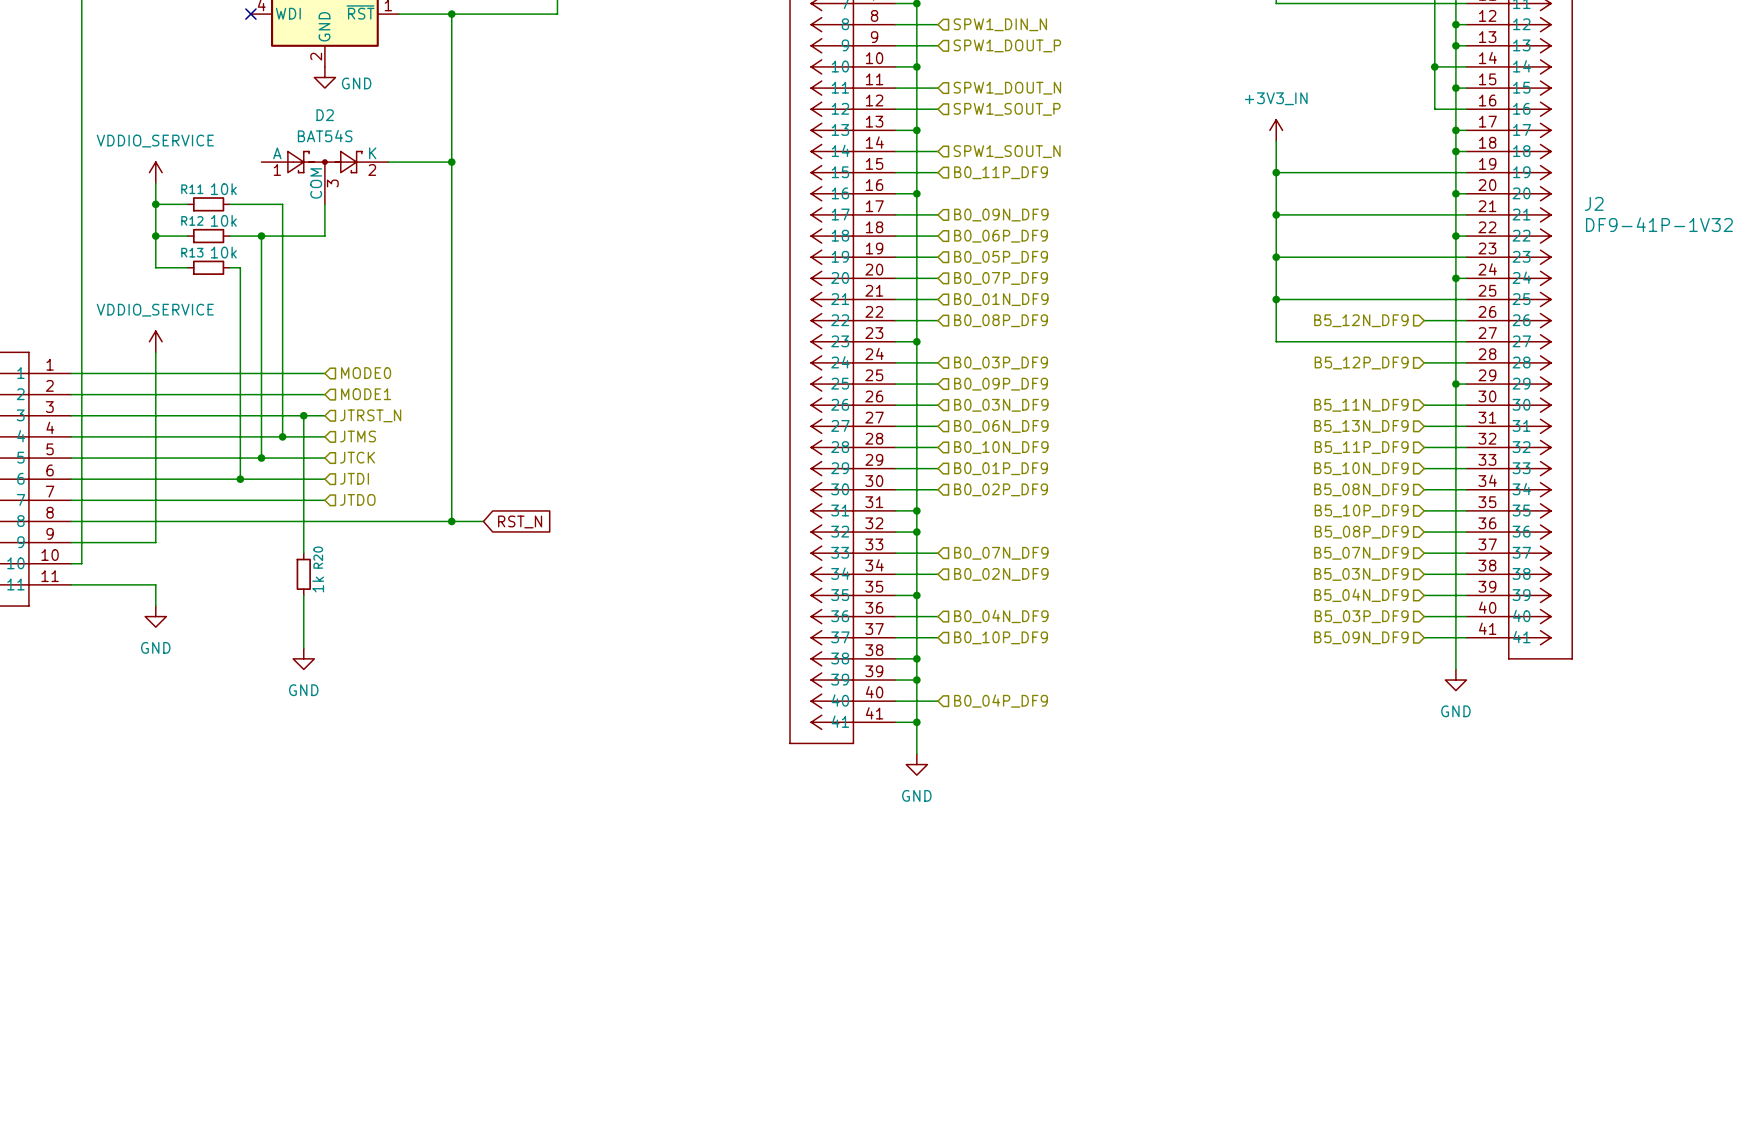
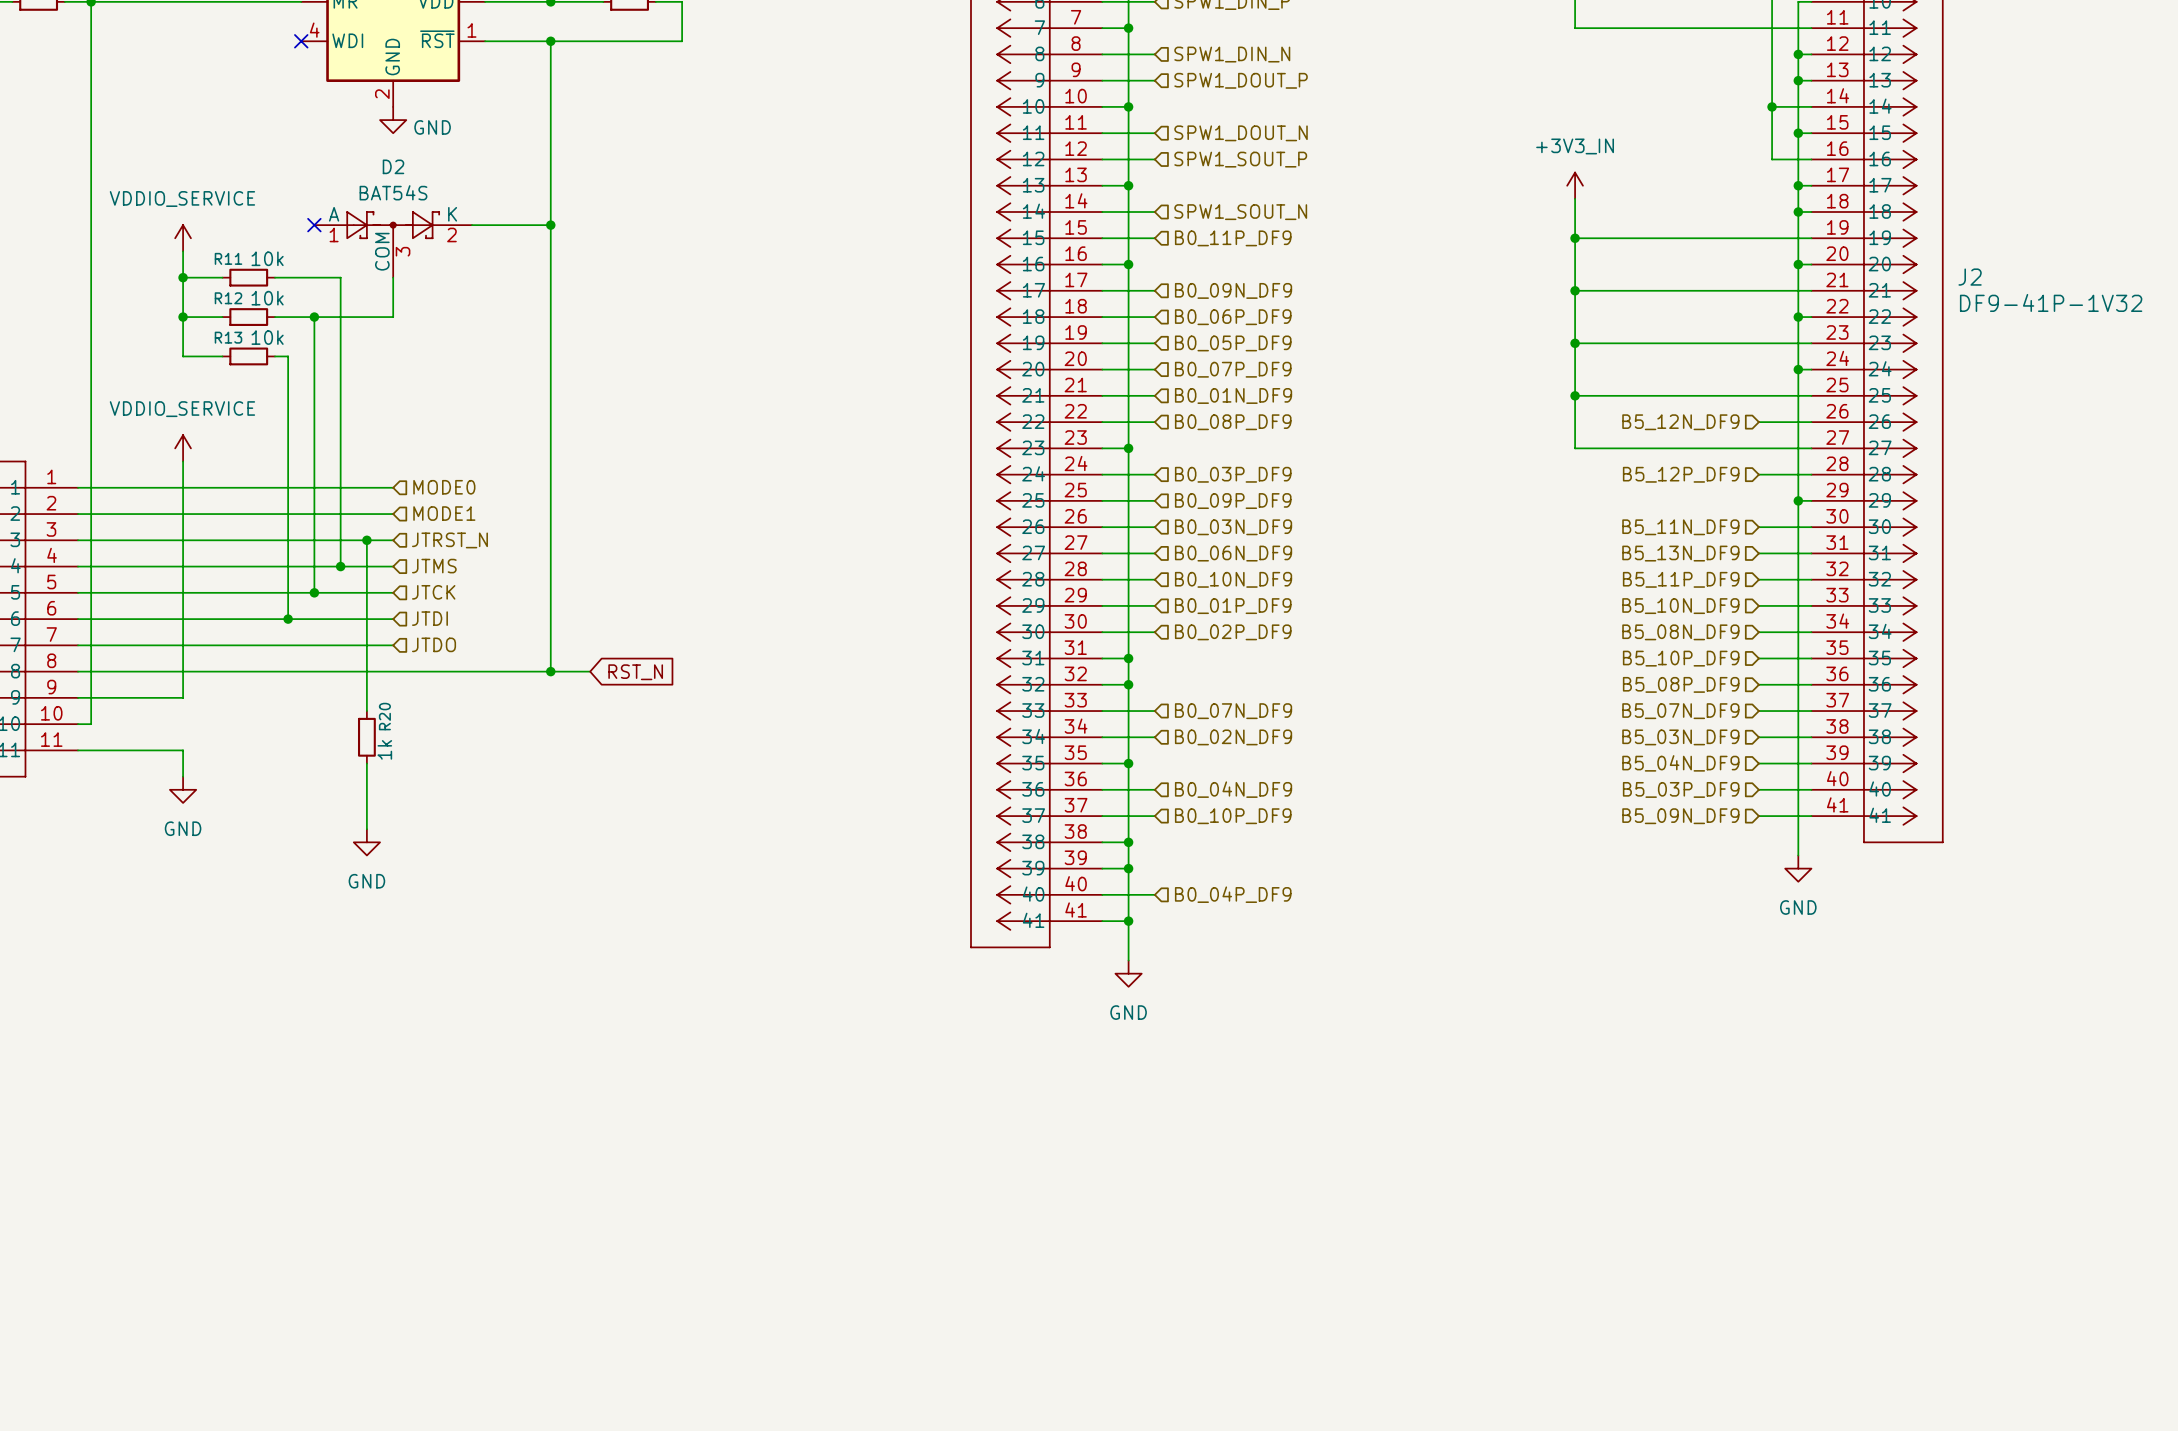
no-connect mark: none -> (314, 225)

